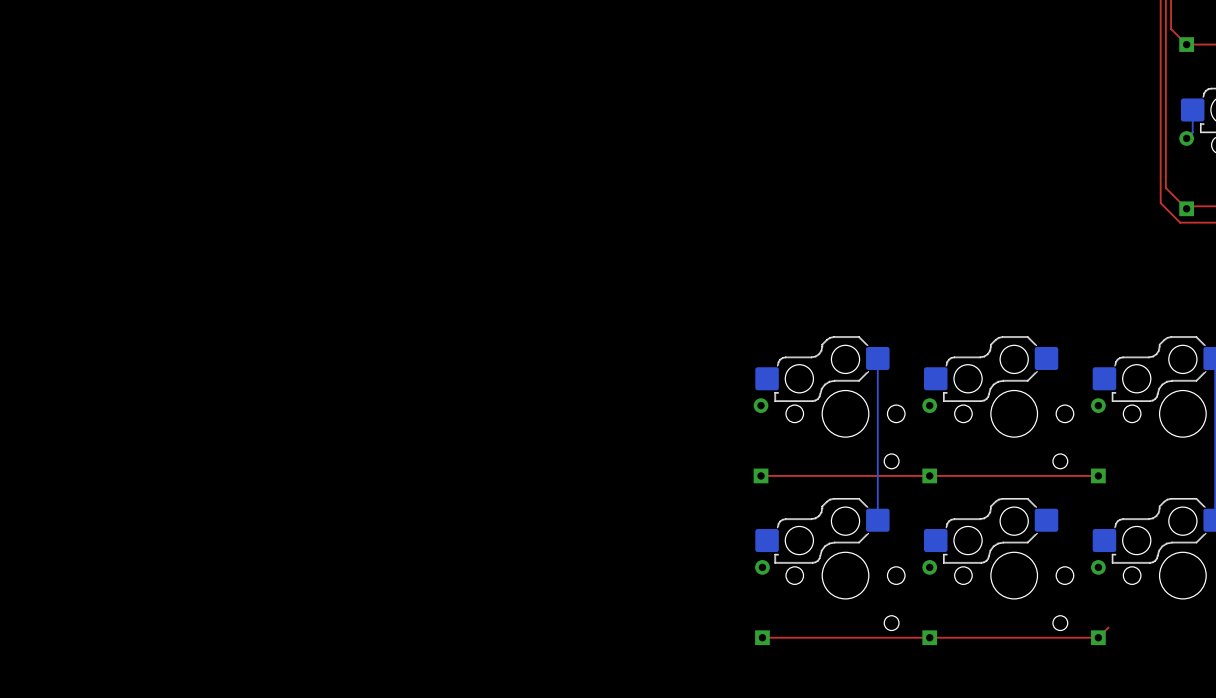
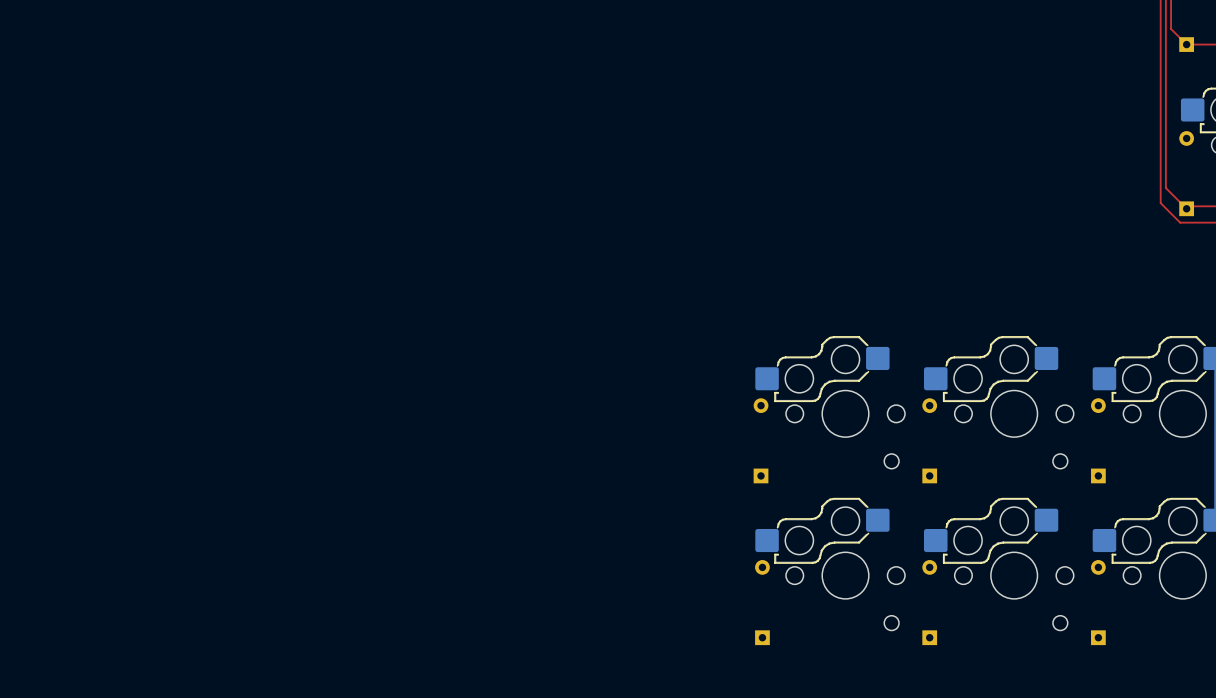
bottom track: (1192, 109) (1192, 132) (1186, 138) -> none
bottom track: (877, 358) (877, 520) -> none
top track: (1098, 475) (761, 475) -> none
top track: (1108, 627) (1098, 637) (762, 637) -> none

